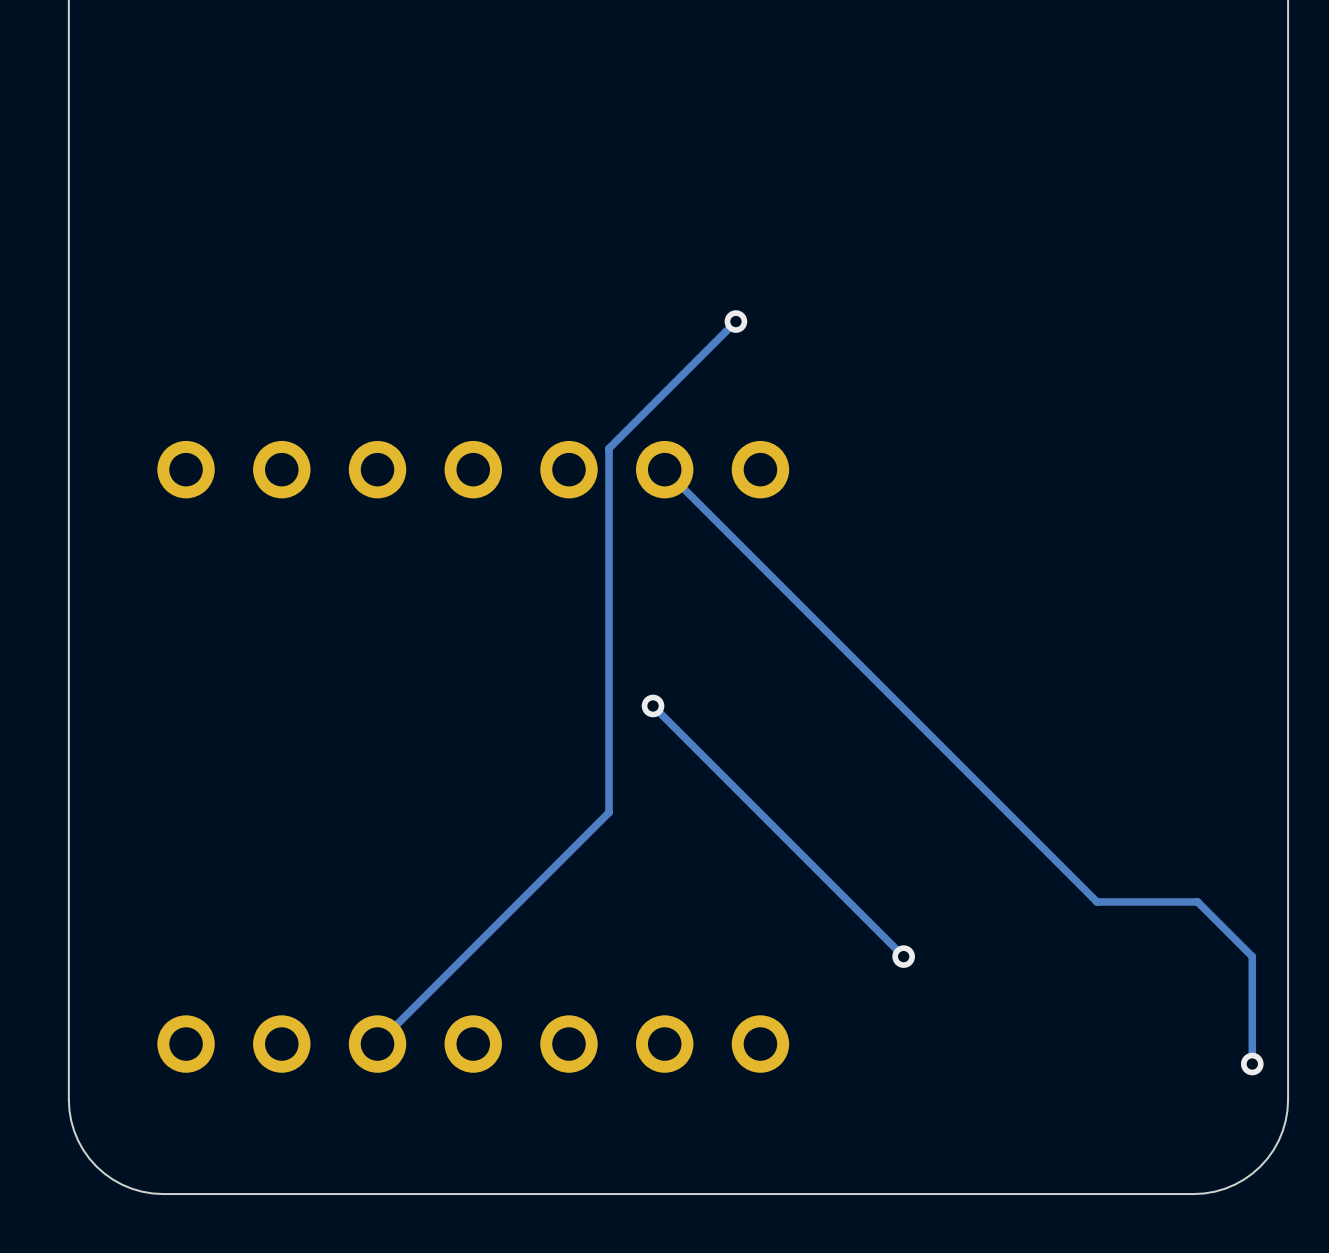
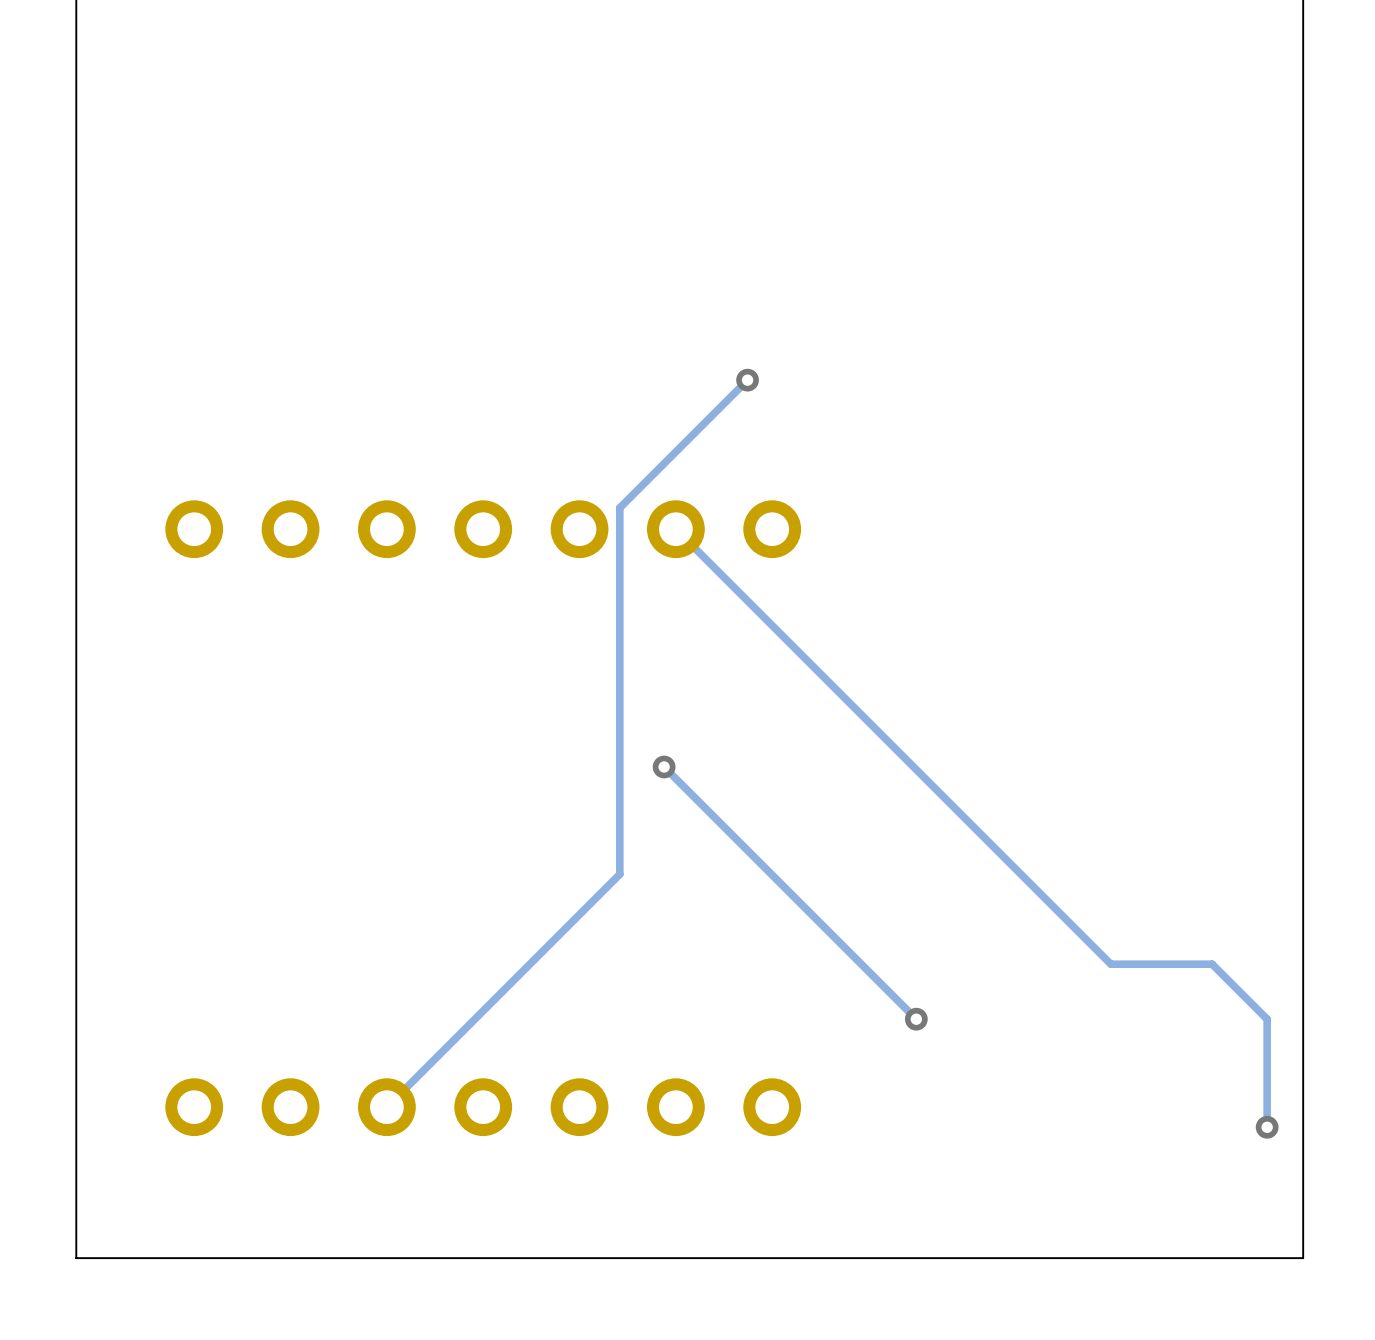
board edge: (68, 1099) (71, 1120) (78, 1140) (96, 1166) (112, 1179) (131, 1188) (163, 1194) -> (76, 1163) (76, 1258) (171, 1258)
board edge: (1288, 1099) (1282, 1130) (1273, 1149) (1260, 1166) (1234, 1184) (1214, 1191) (1193, 1194) -> (1303, 1163) (1303, 1258) (1208, 1258)

